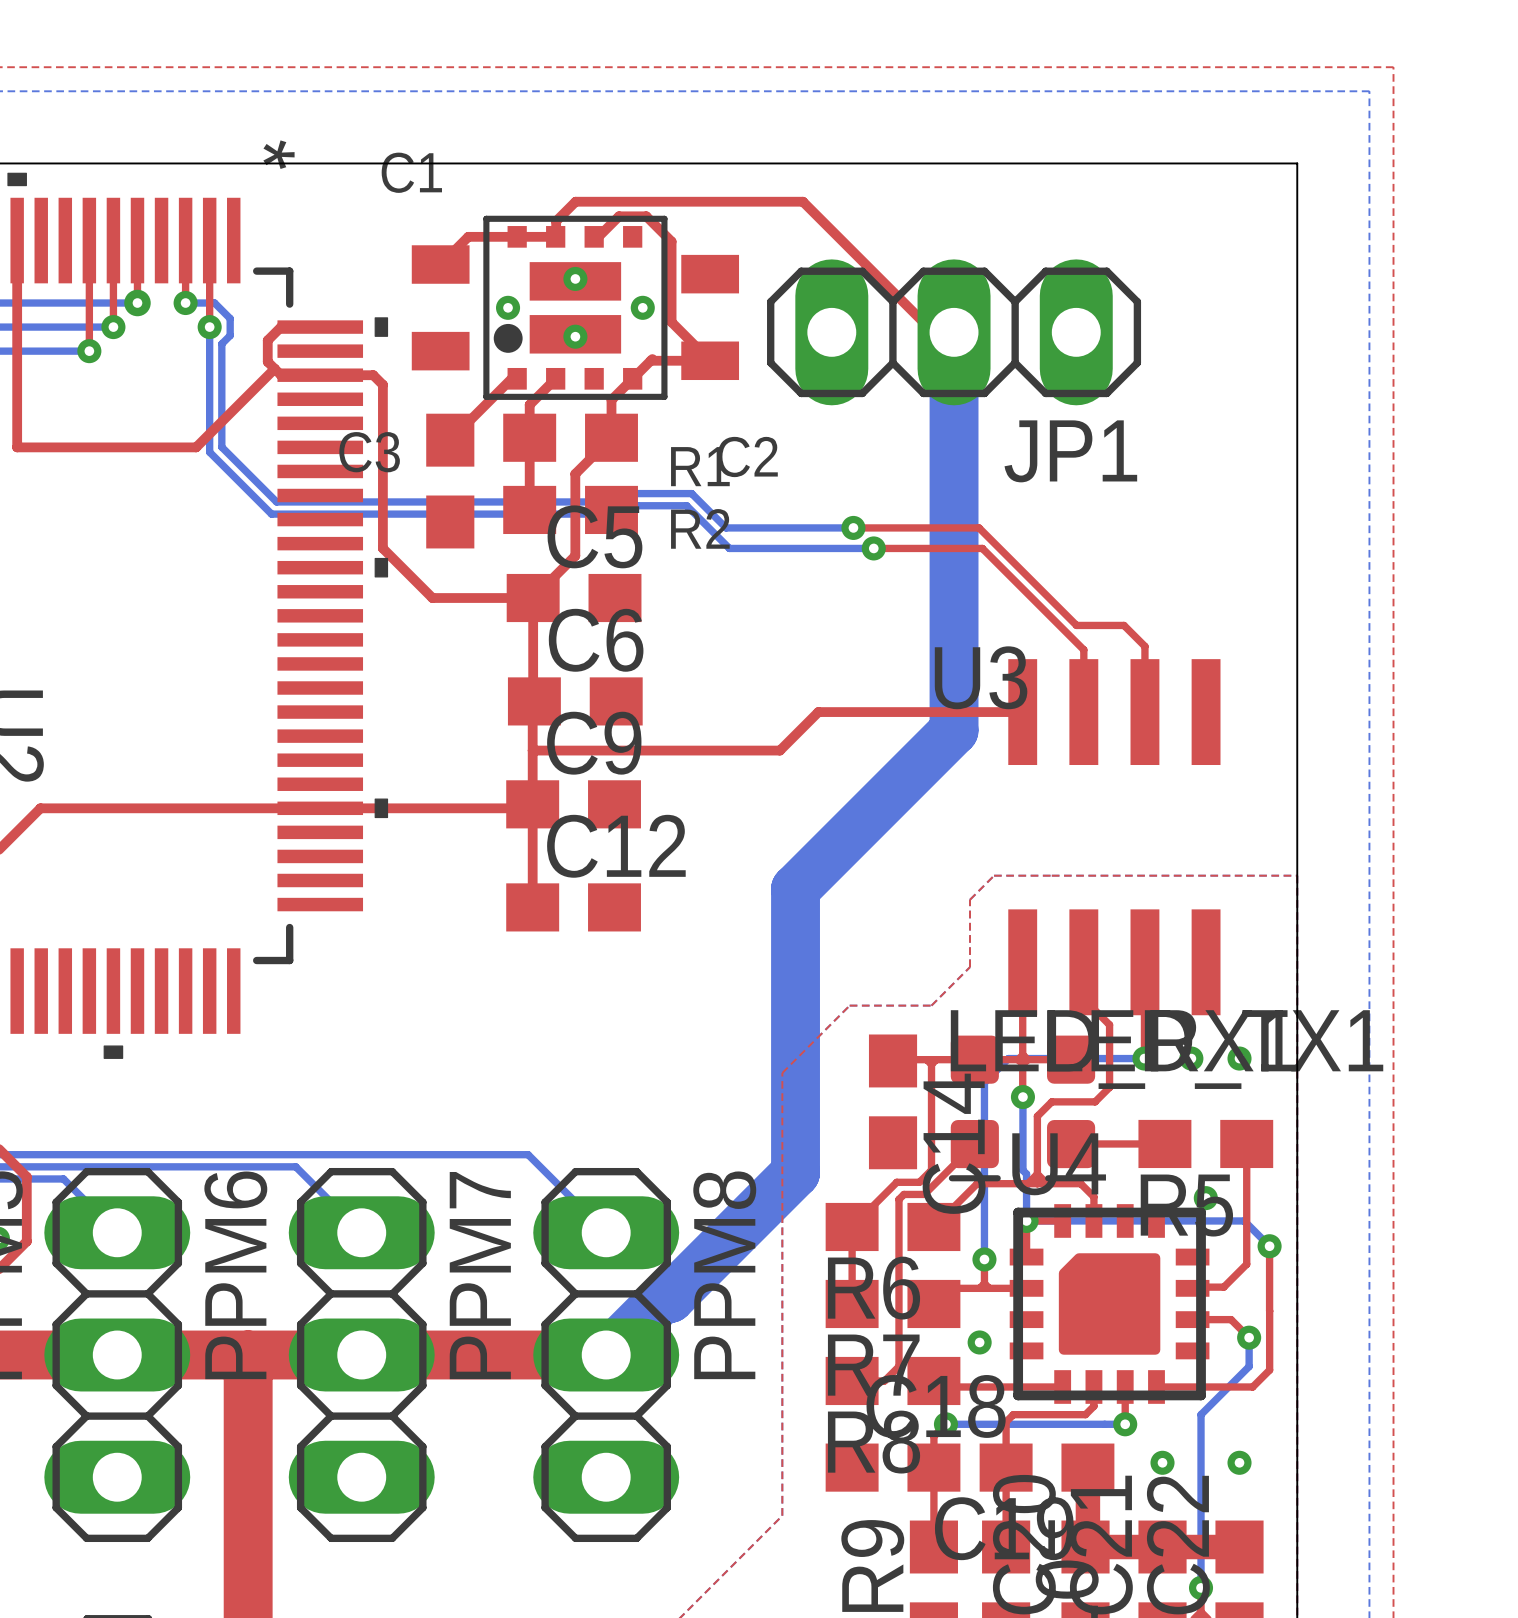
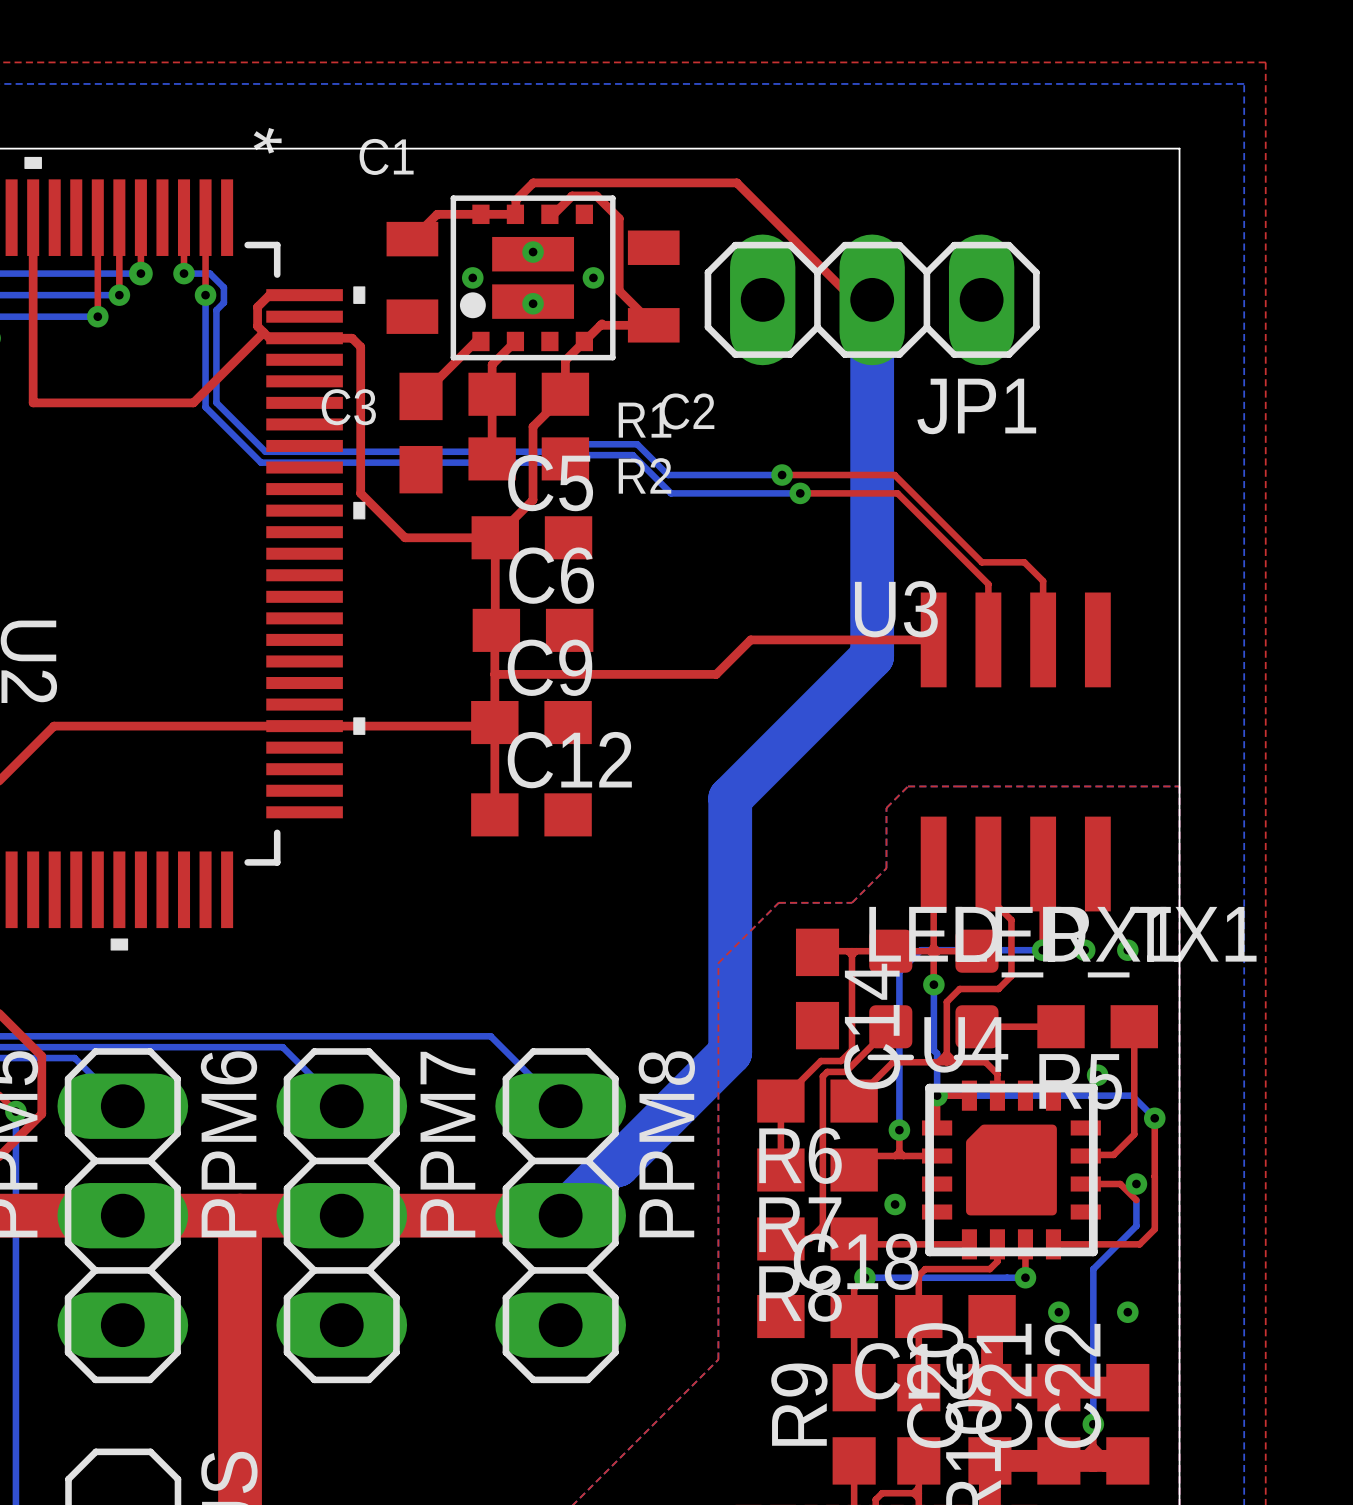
via position: (1249, 1337) -> (1136, 1184)

